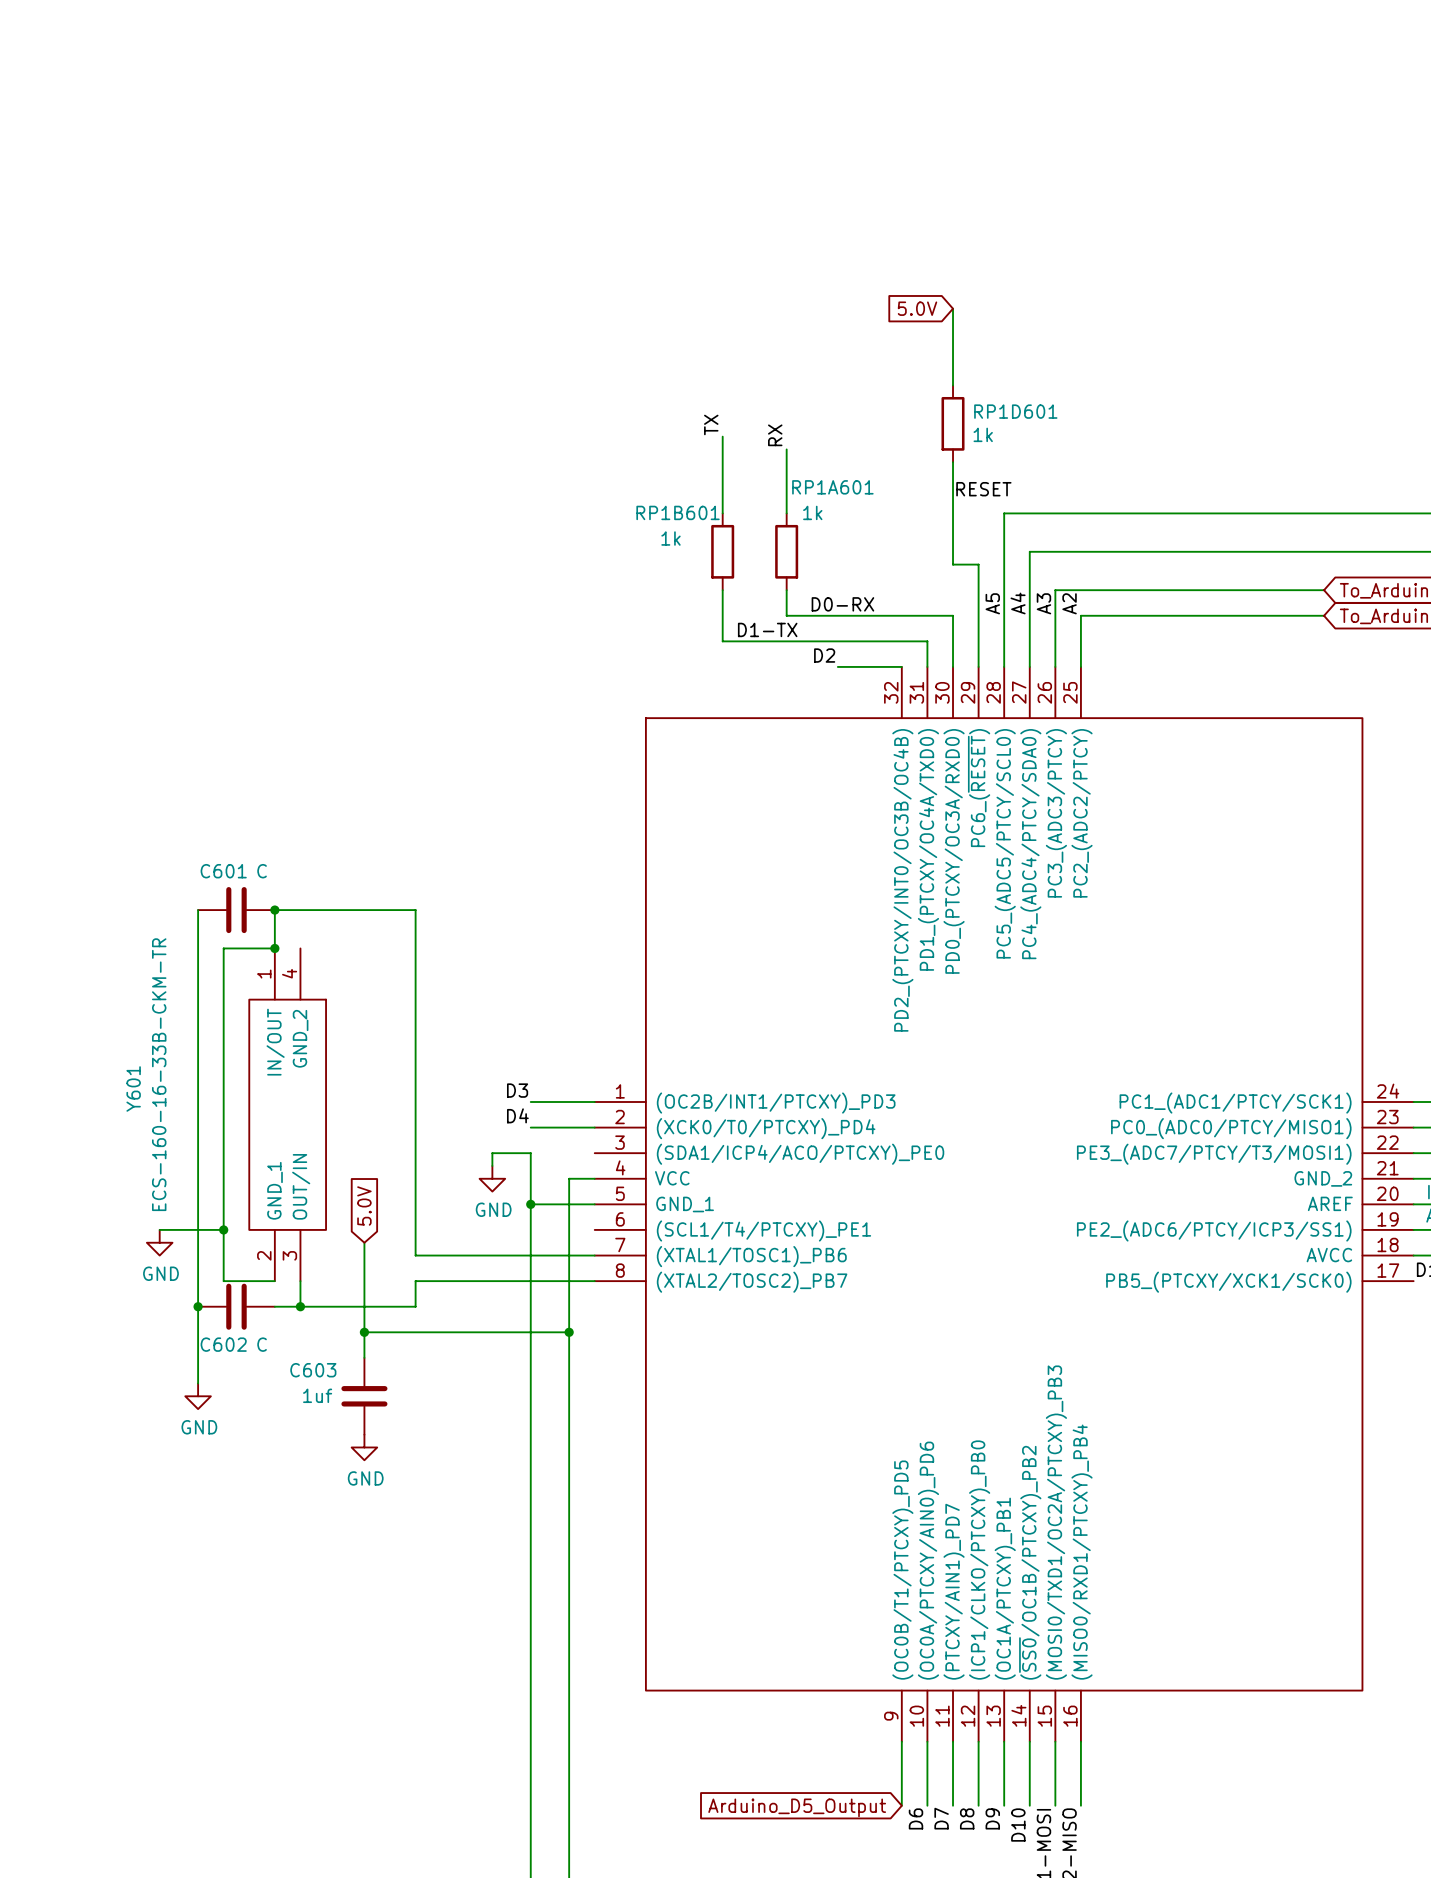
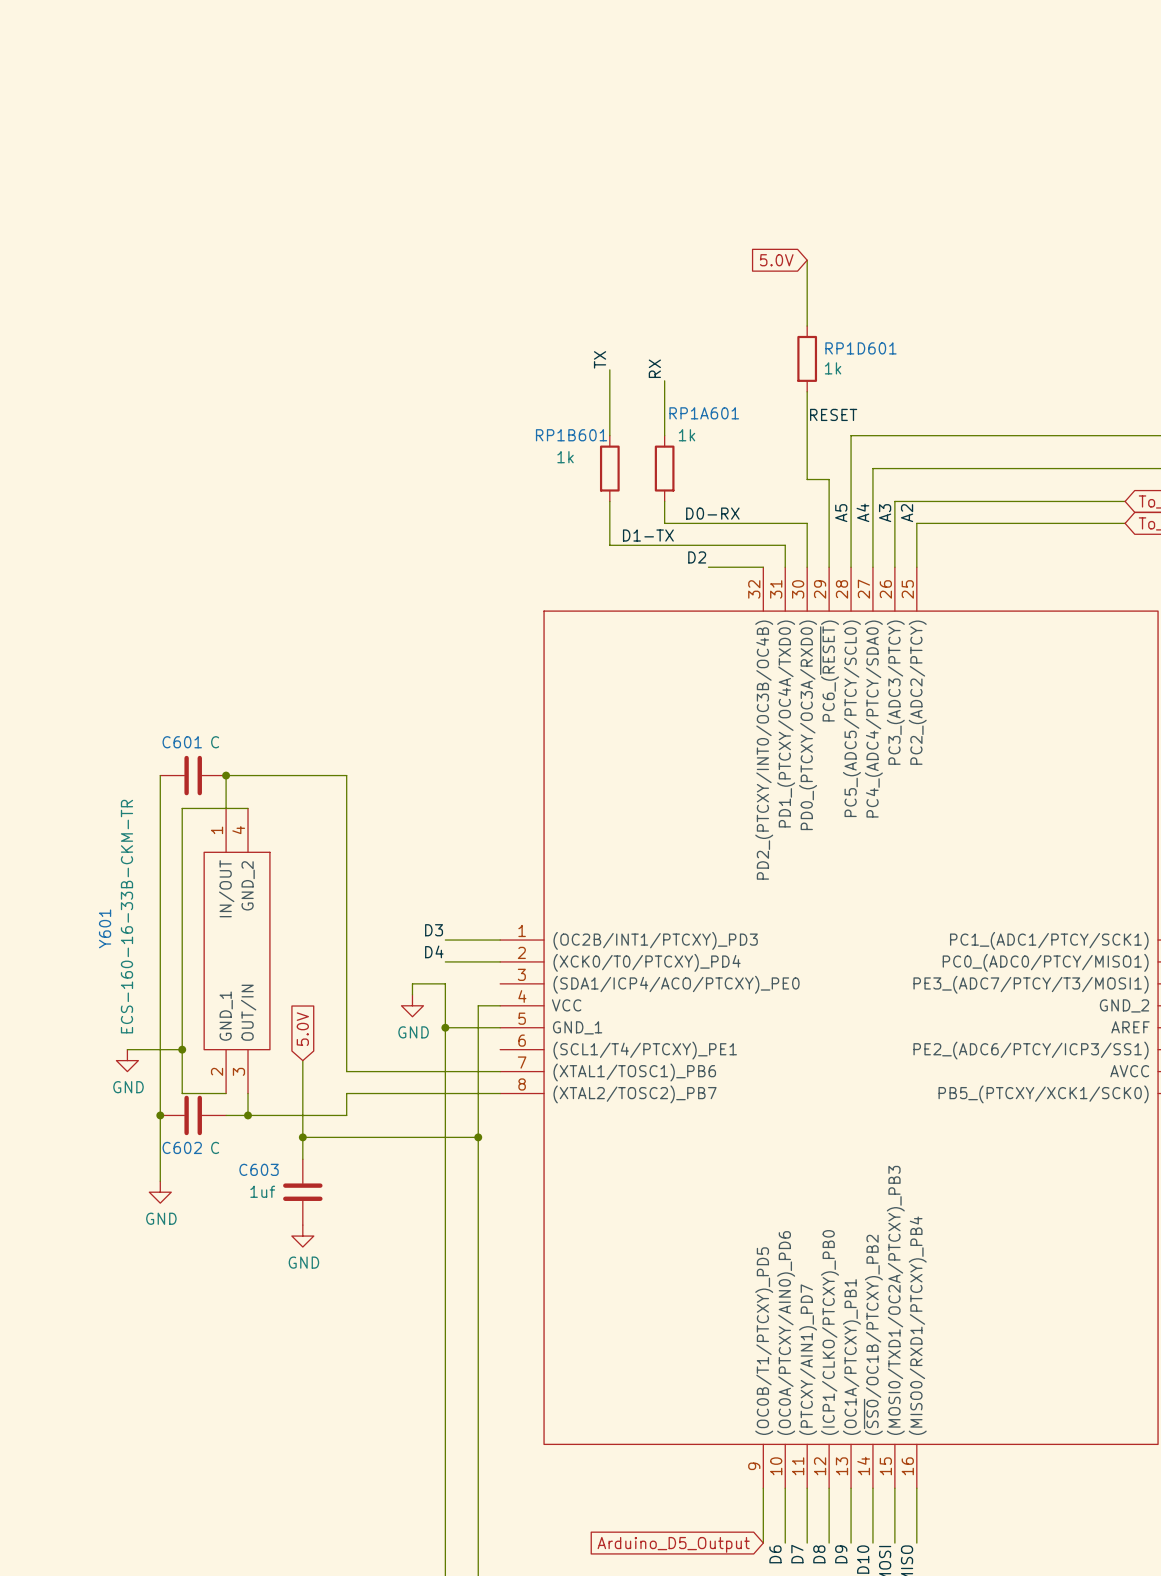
wire: none -> (226, 808) (248, 808)
junction: (274, 948) -> none

